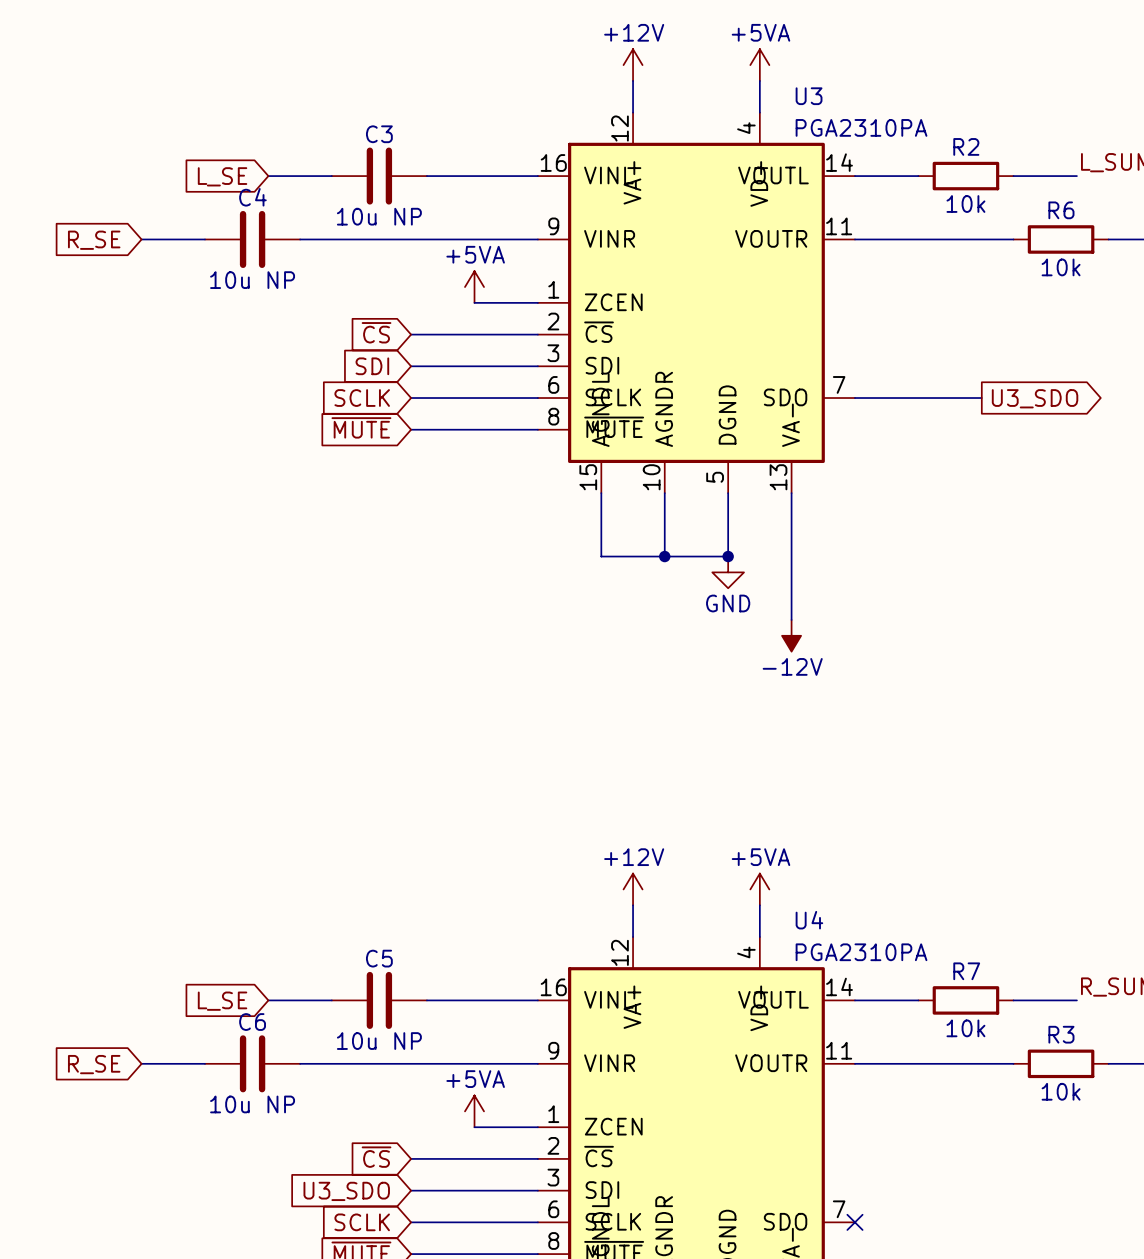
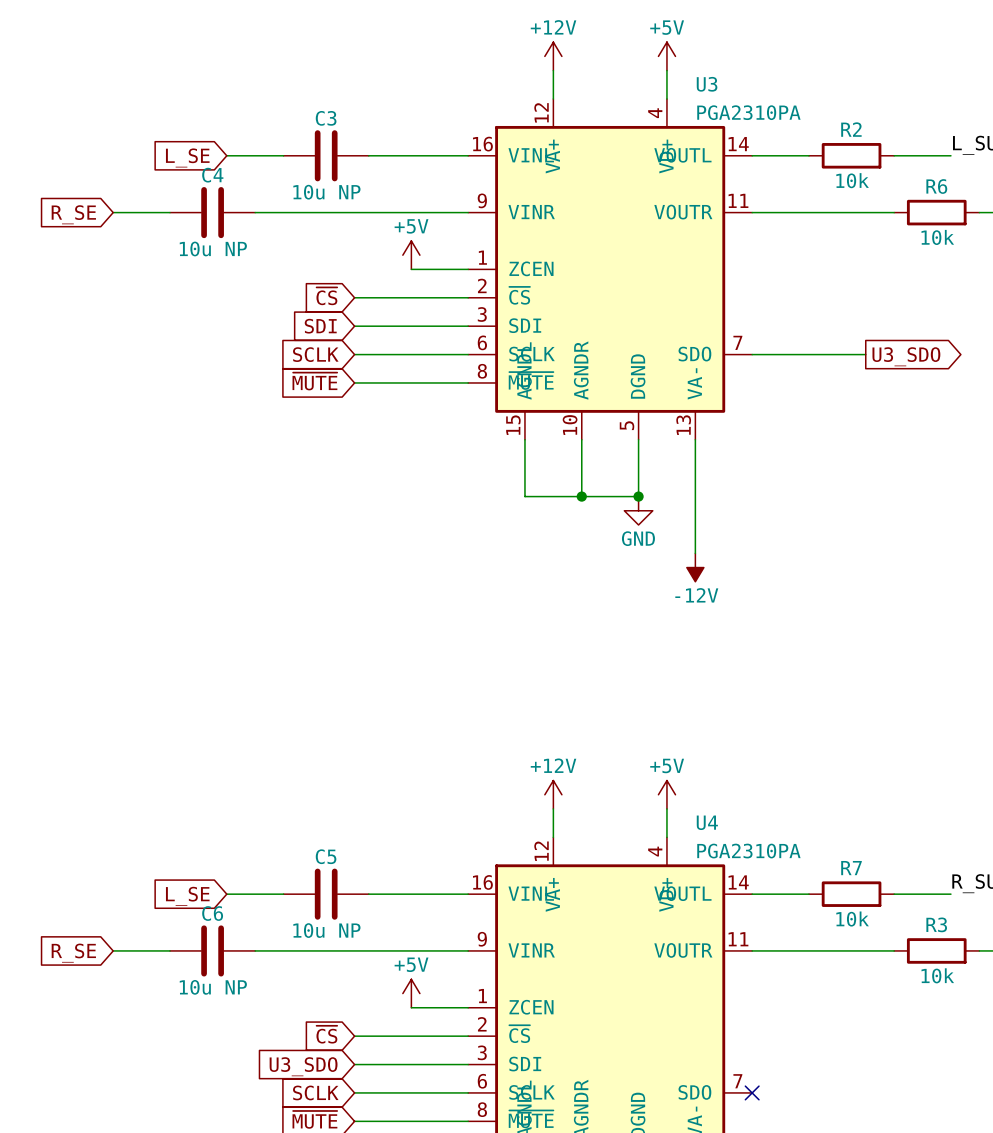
power symbol: +5VA (759, 65) -> +5V (666, 56)
power symbol: +5VA (474, 287) -> +5V (411, 255)
power symbol: +5VA (759, 889) -> +5V (666, 794)
power symbol: +5VA (474, 1111) -> +5V (411, 993)

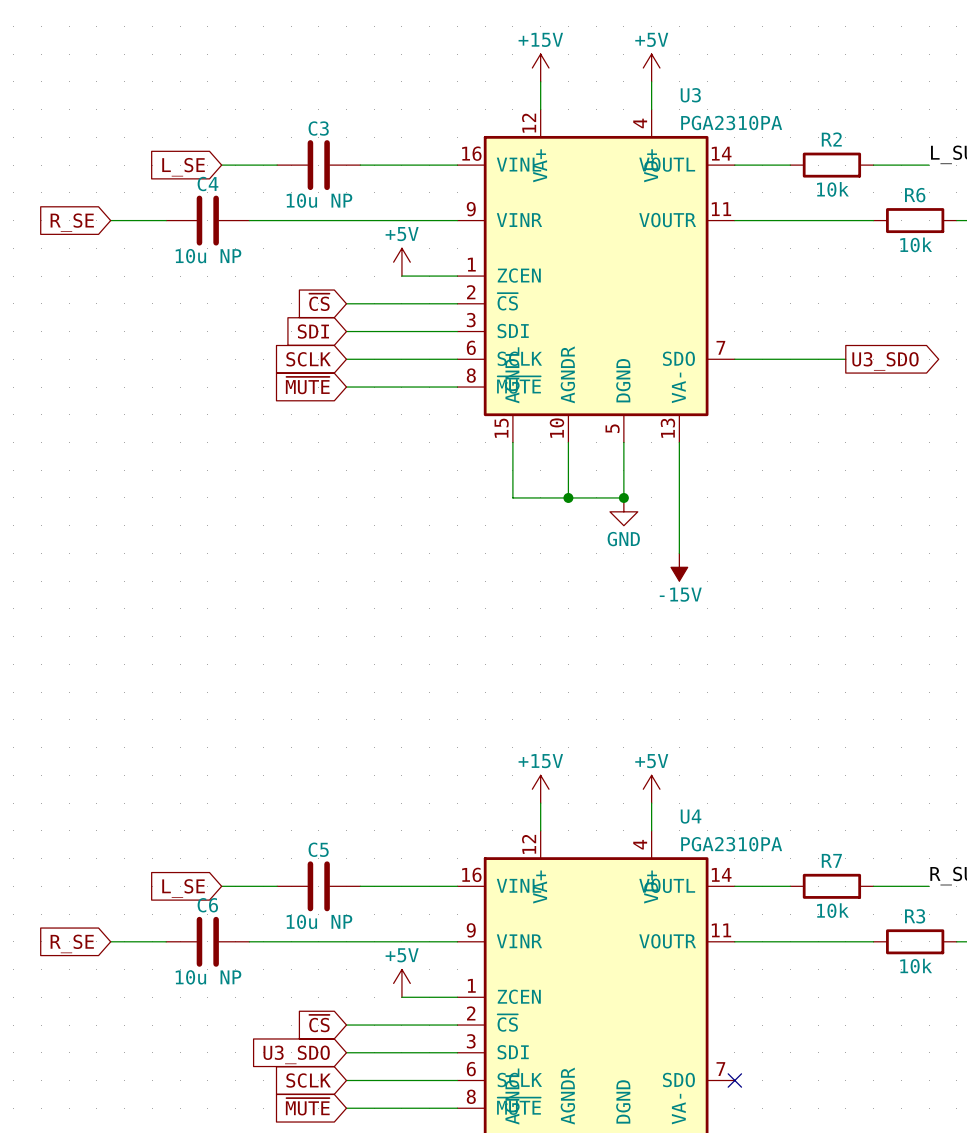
power symbol: +12V (553, 56) -> +15V (540, 68)
power symbol: -12V (695, 567) -> -15V (679, 567)
power symbol: +12V (553, 794) -> +15V (540, 789)

